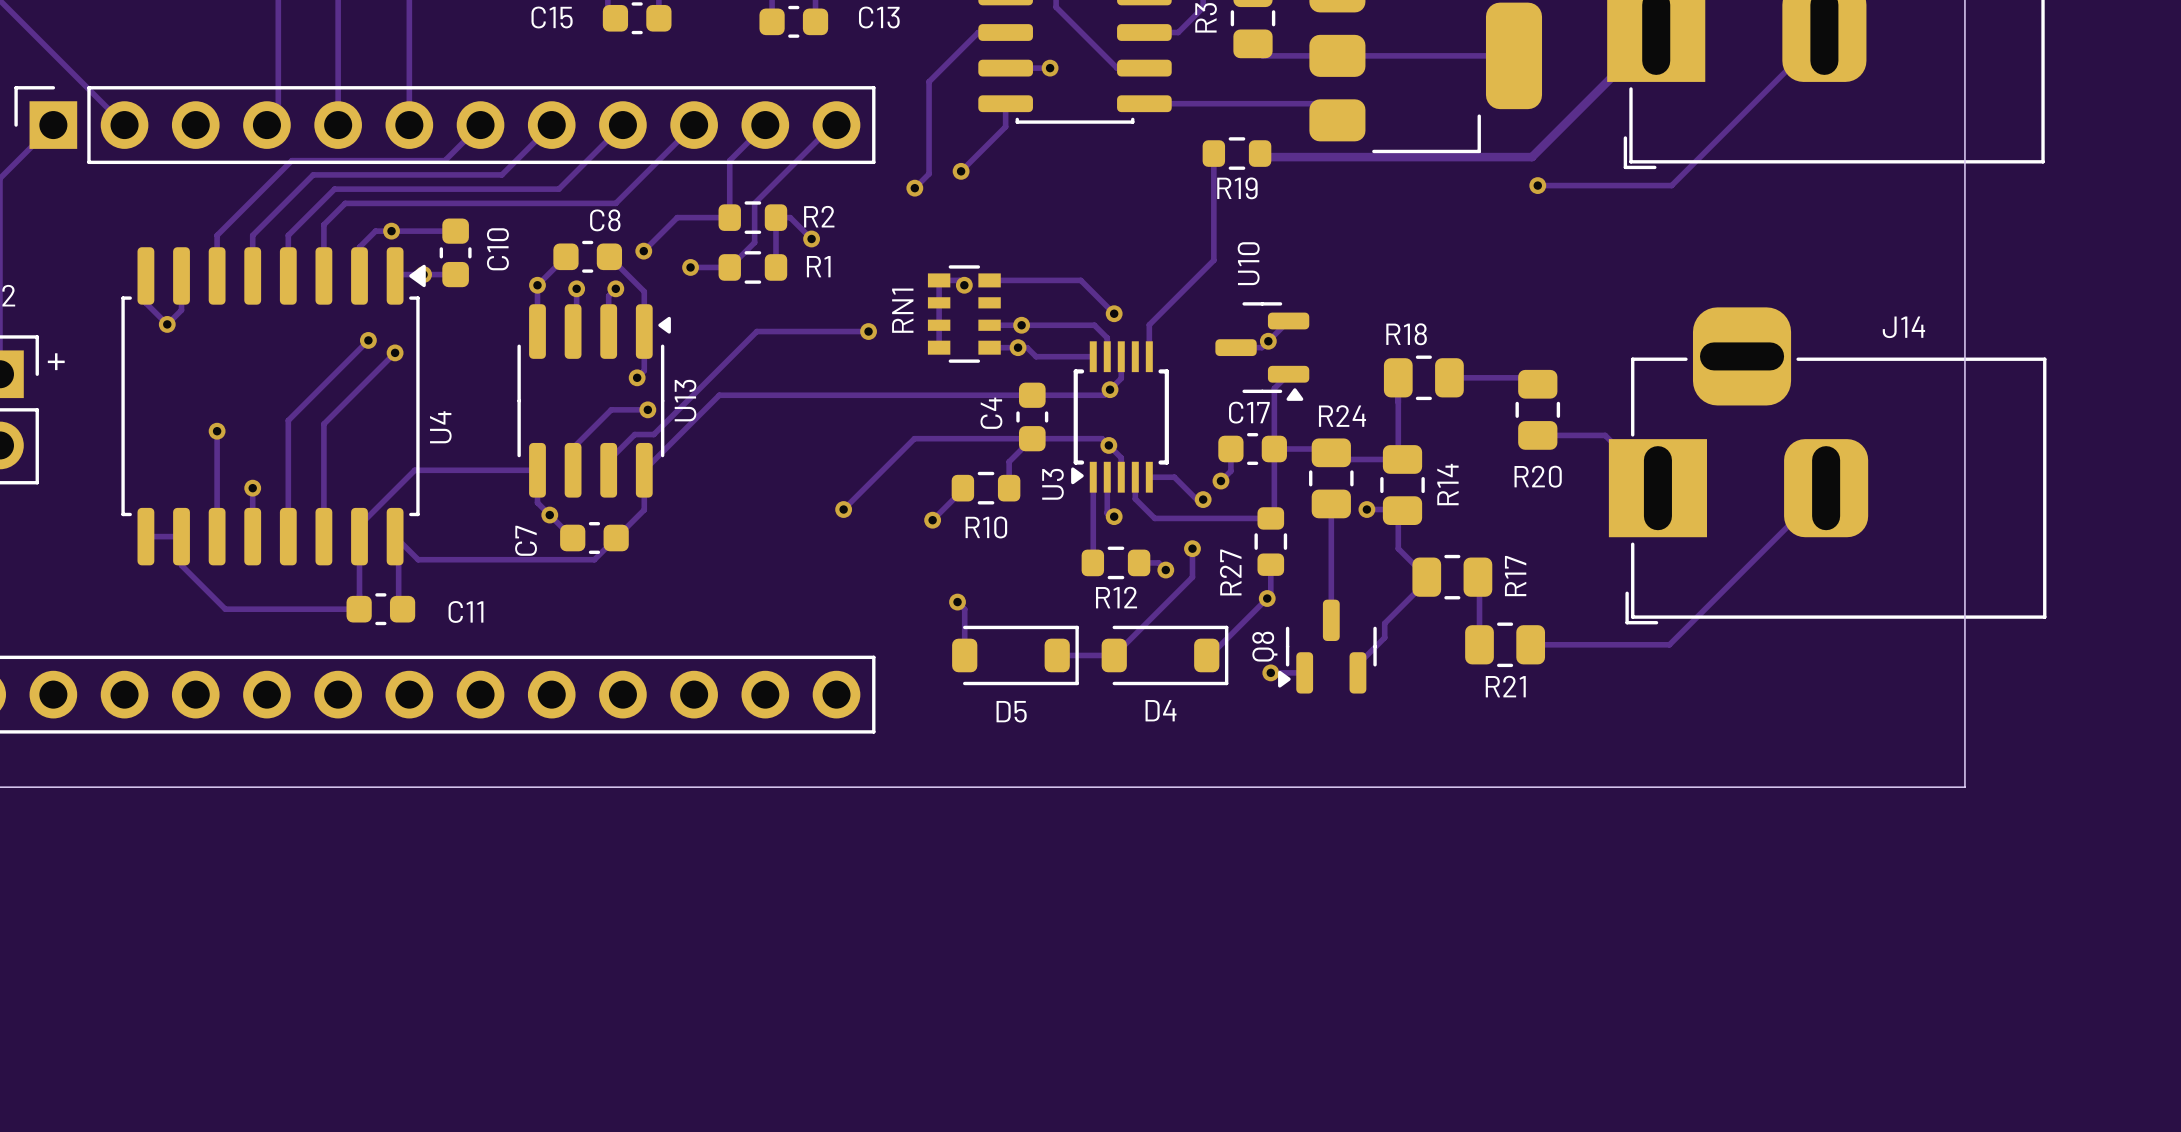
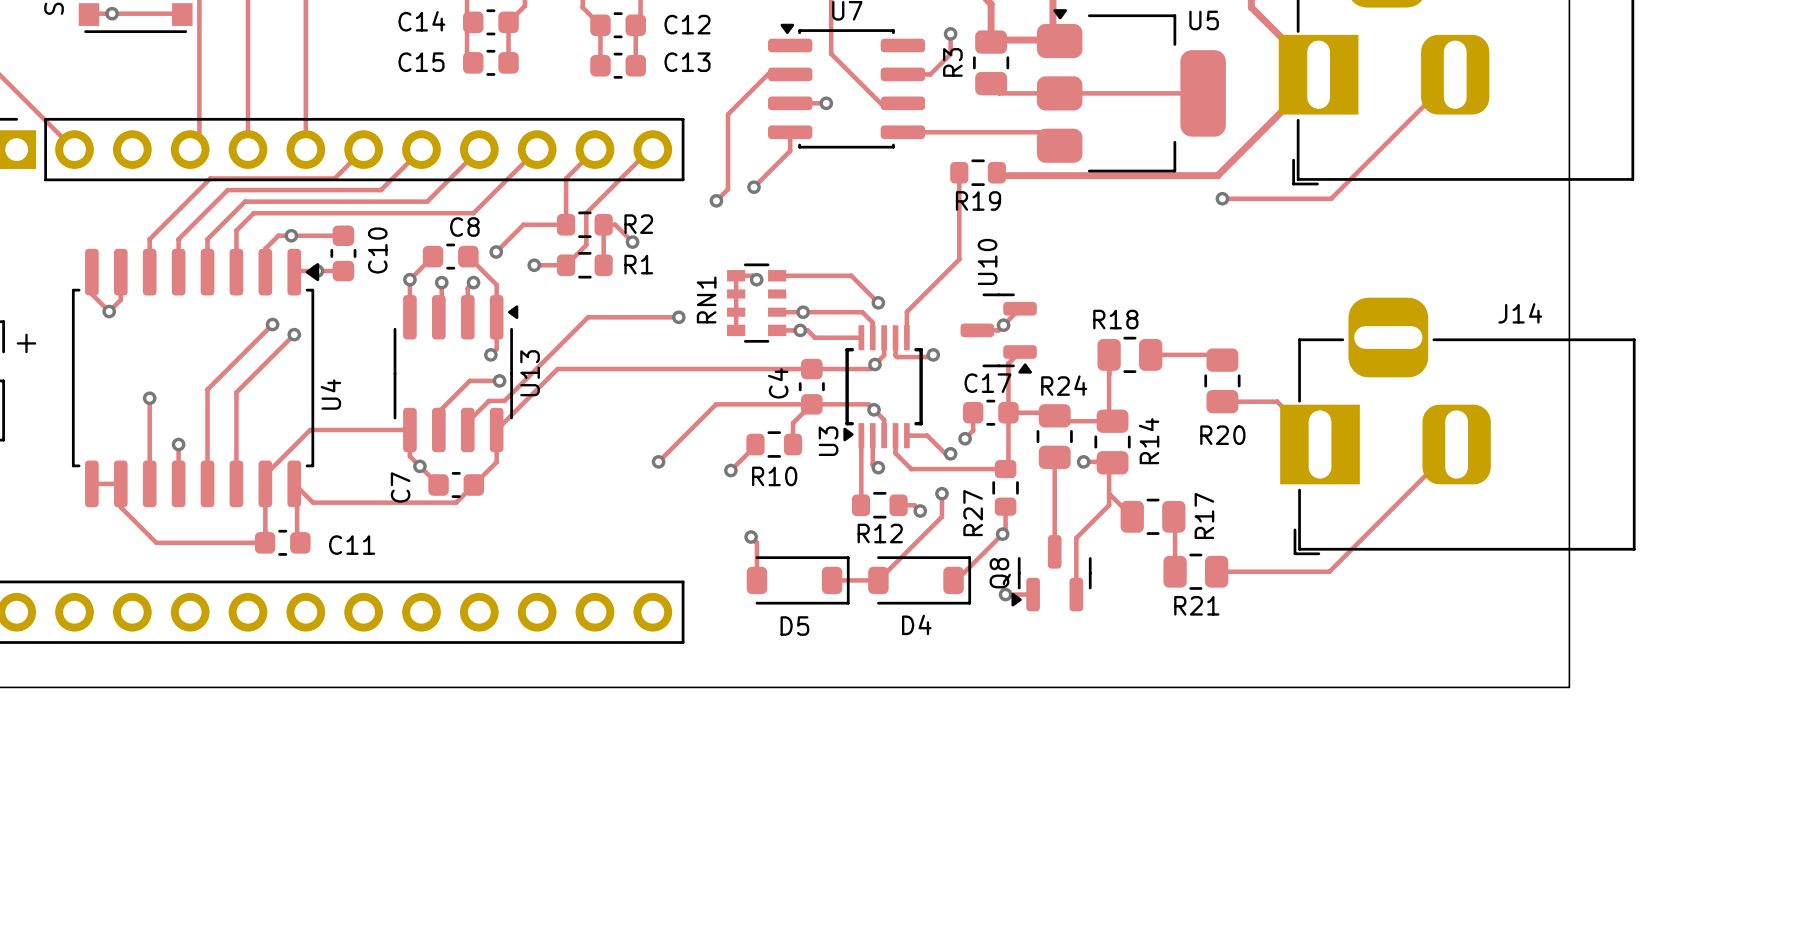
track: none -> (895, 337) (895, 355) (897, 357) (931, 357) (933, 354)
via: none -> (933, 354)
track: (1426, 577) (1426, 581) (1384, 623) (1384, 637) (1357, 664) -> (1109, 493) (1109, 505) (1076, 538) (1076, 587)

